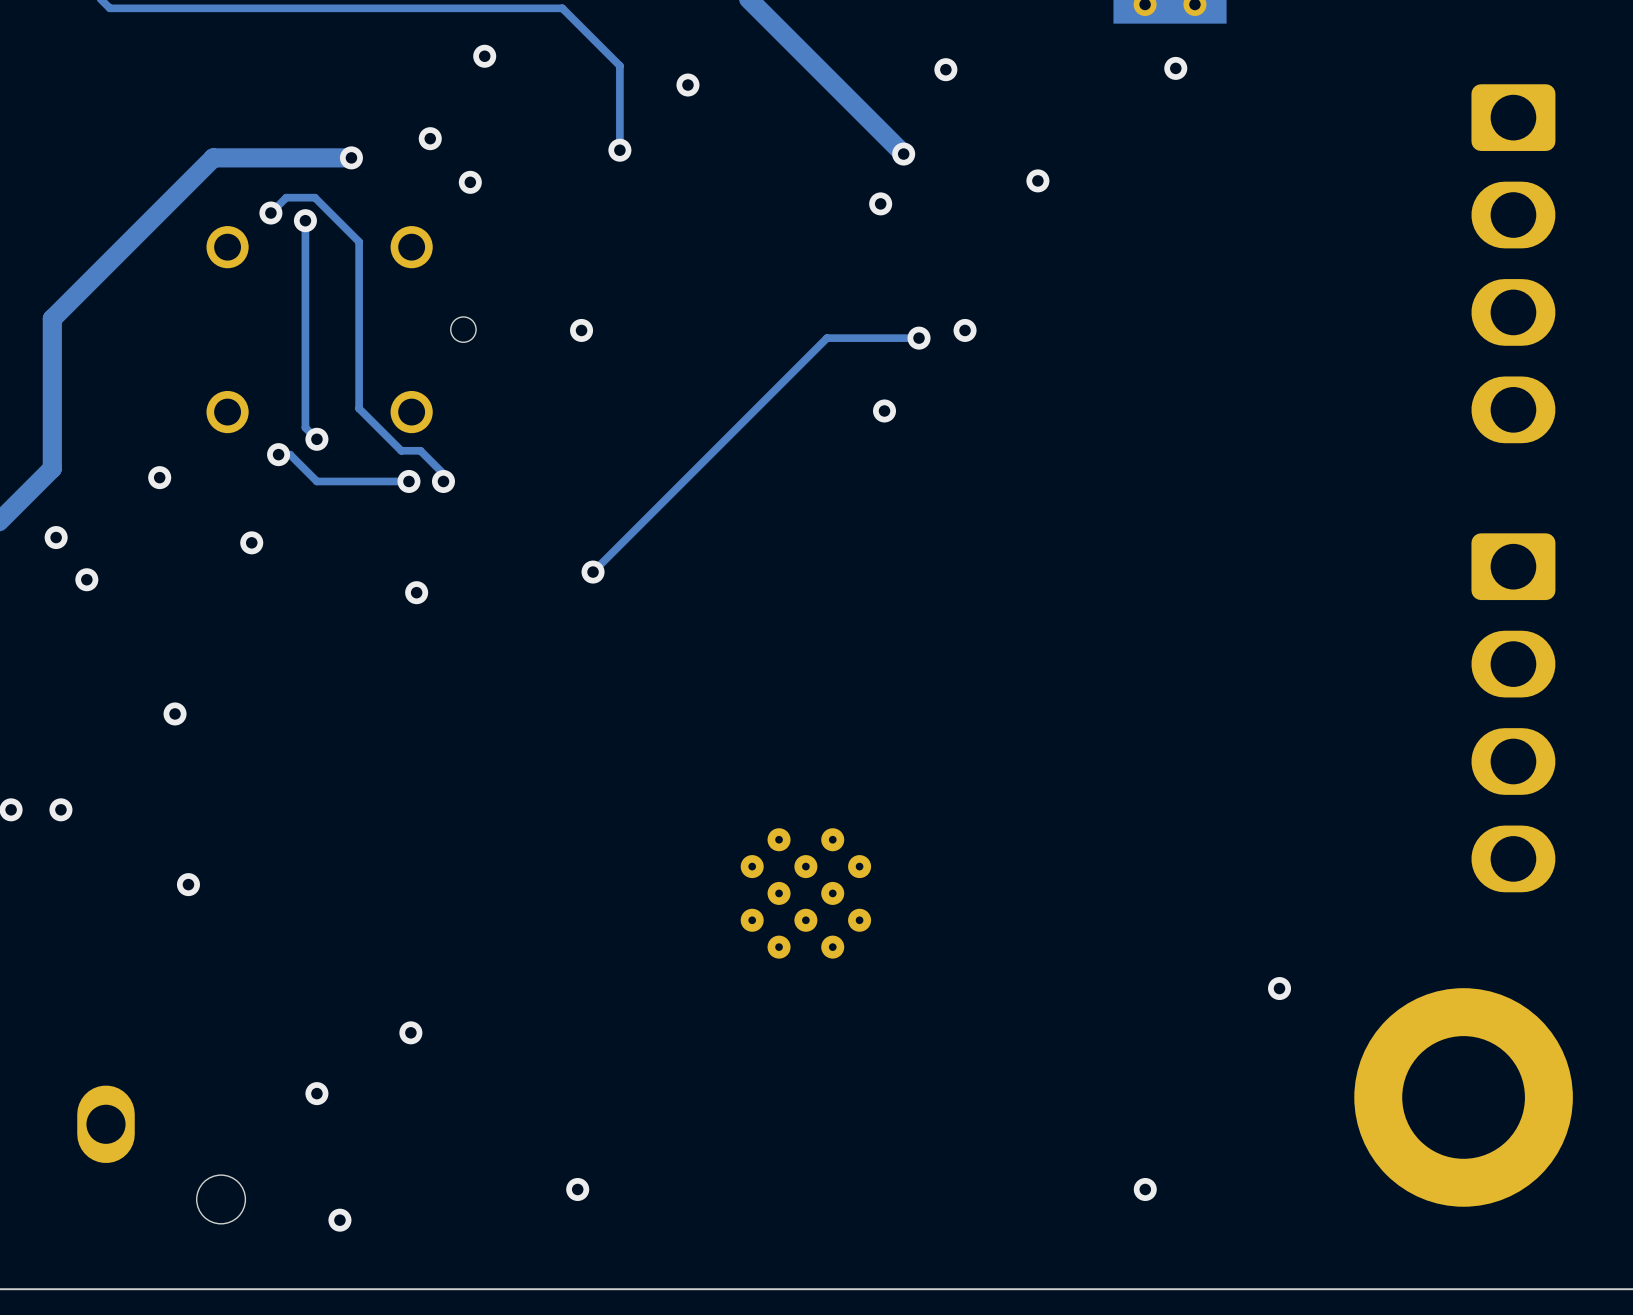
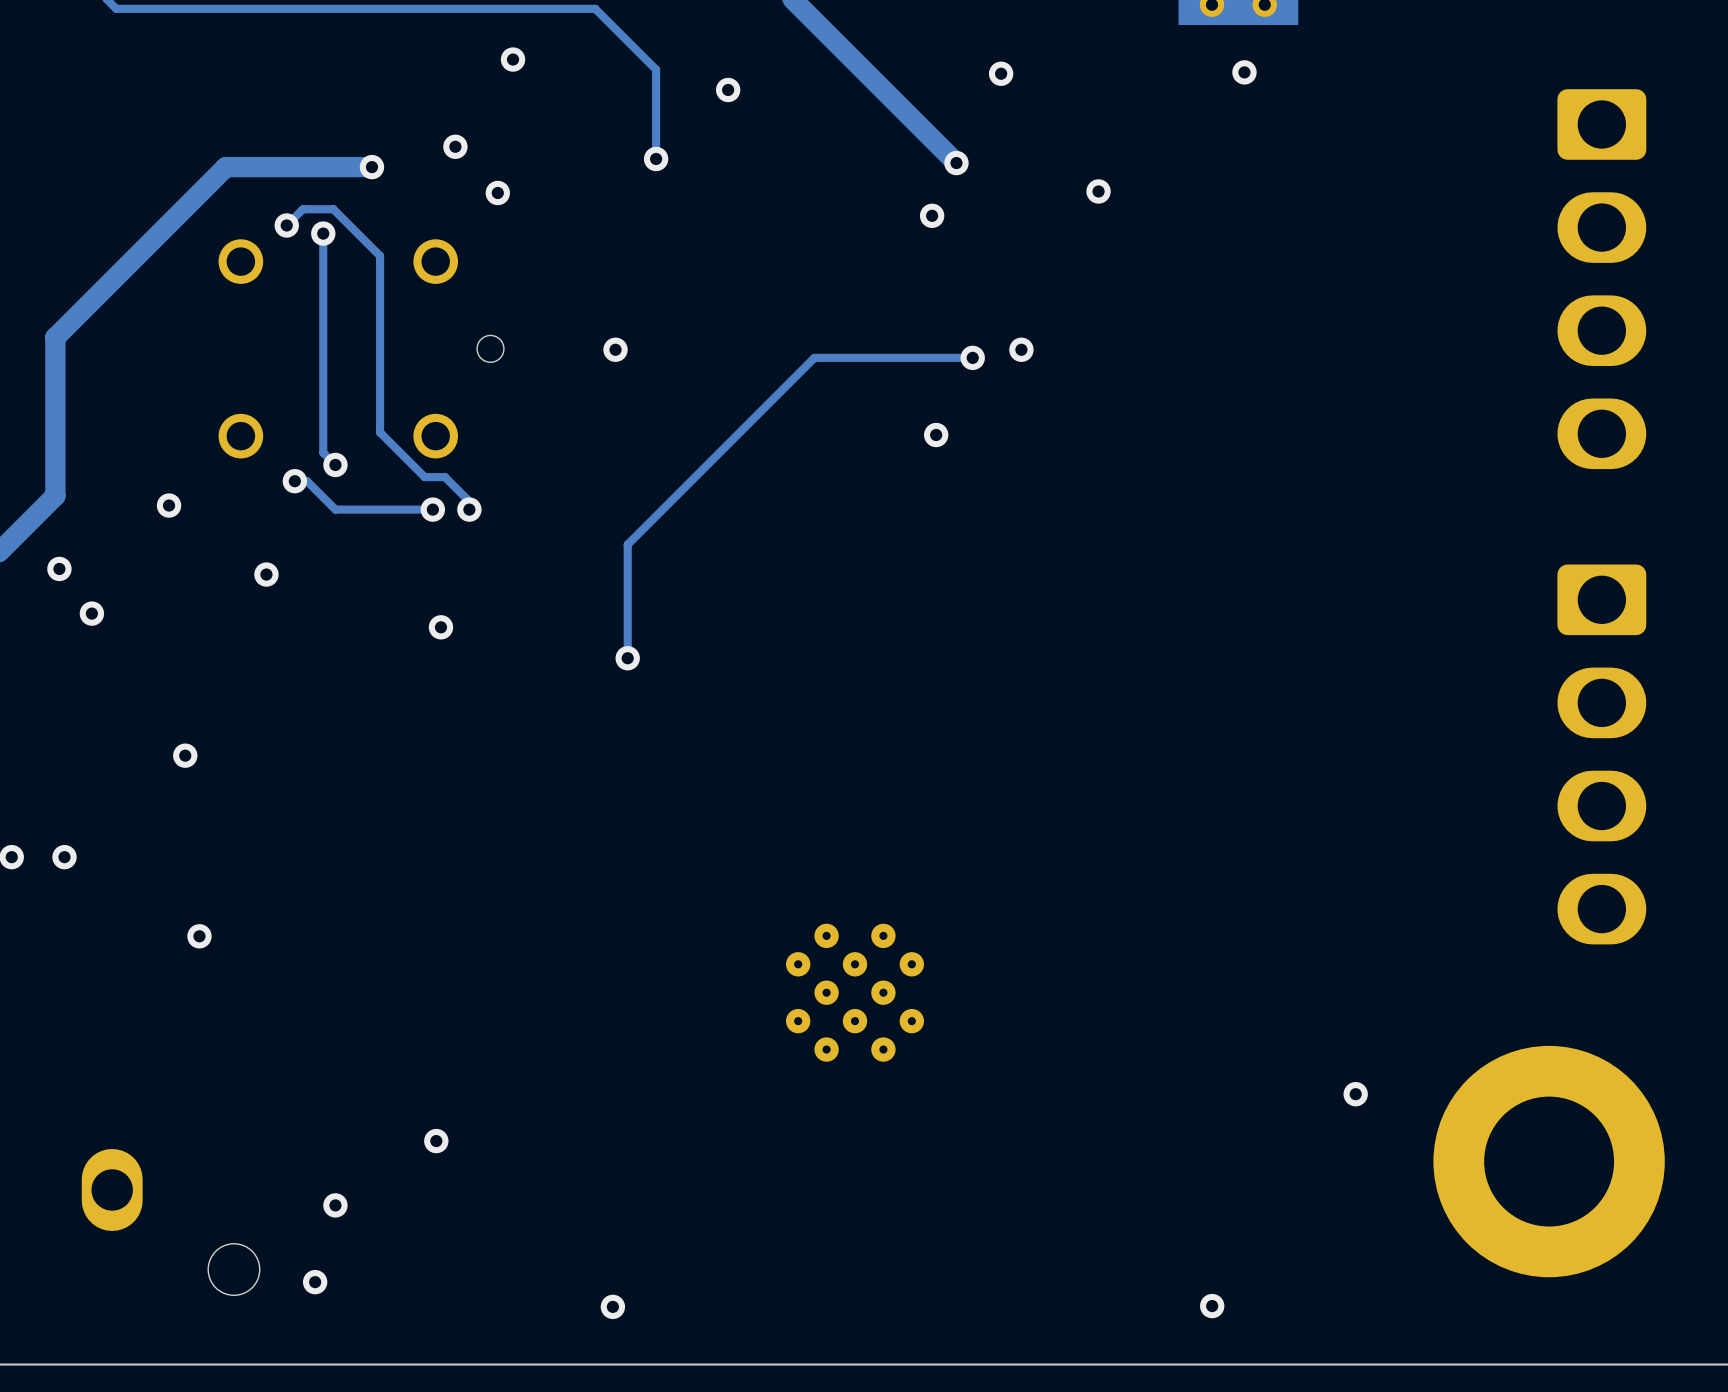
track: (826, 338) (593, 572) -> (875, 357) (814, 357) (627, 544) (627, 658)
via position: (593, 572) -> (627, 658)
part position: (805, 893) -> (855, 992)
via position: (1279, 988) -> (1355, 1094)
via position: (410, 1032) -> (436, 1141)
via: (316, 1093) -> none
via: none -> (335, 1205)
via position: (577, 1189) -> (612, 1306)
via position: (1145, 1189) -> (1212, 1306)
via: none -> (315, 1282)
via: (339, 1220) -> none

